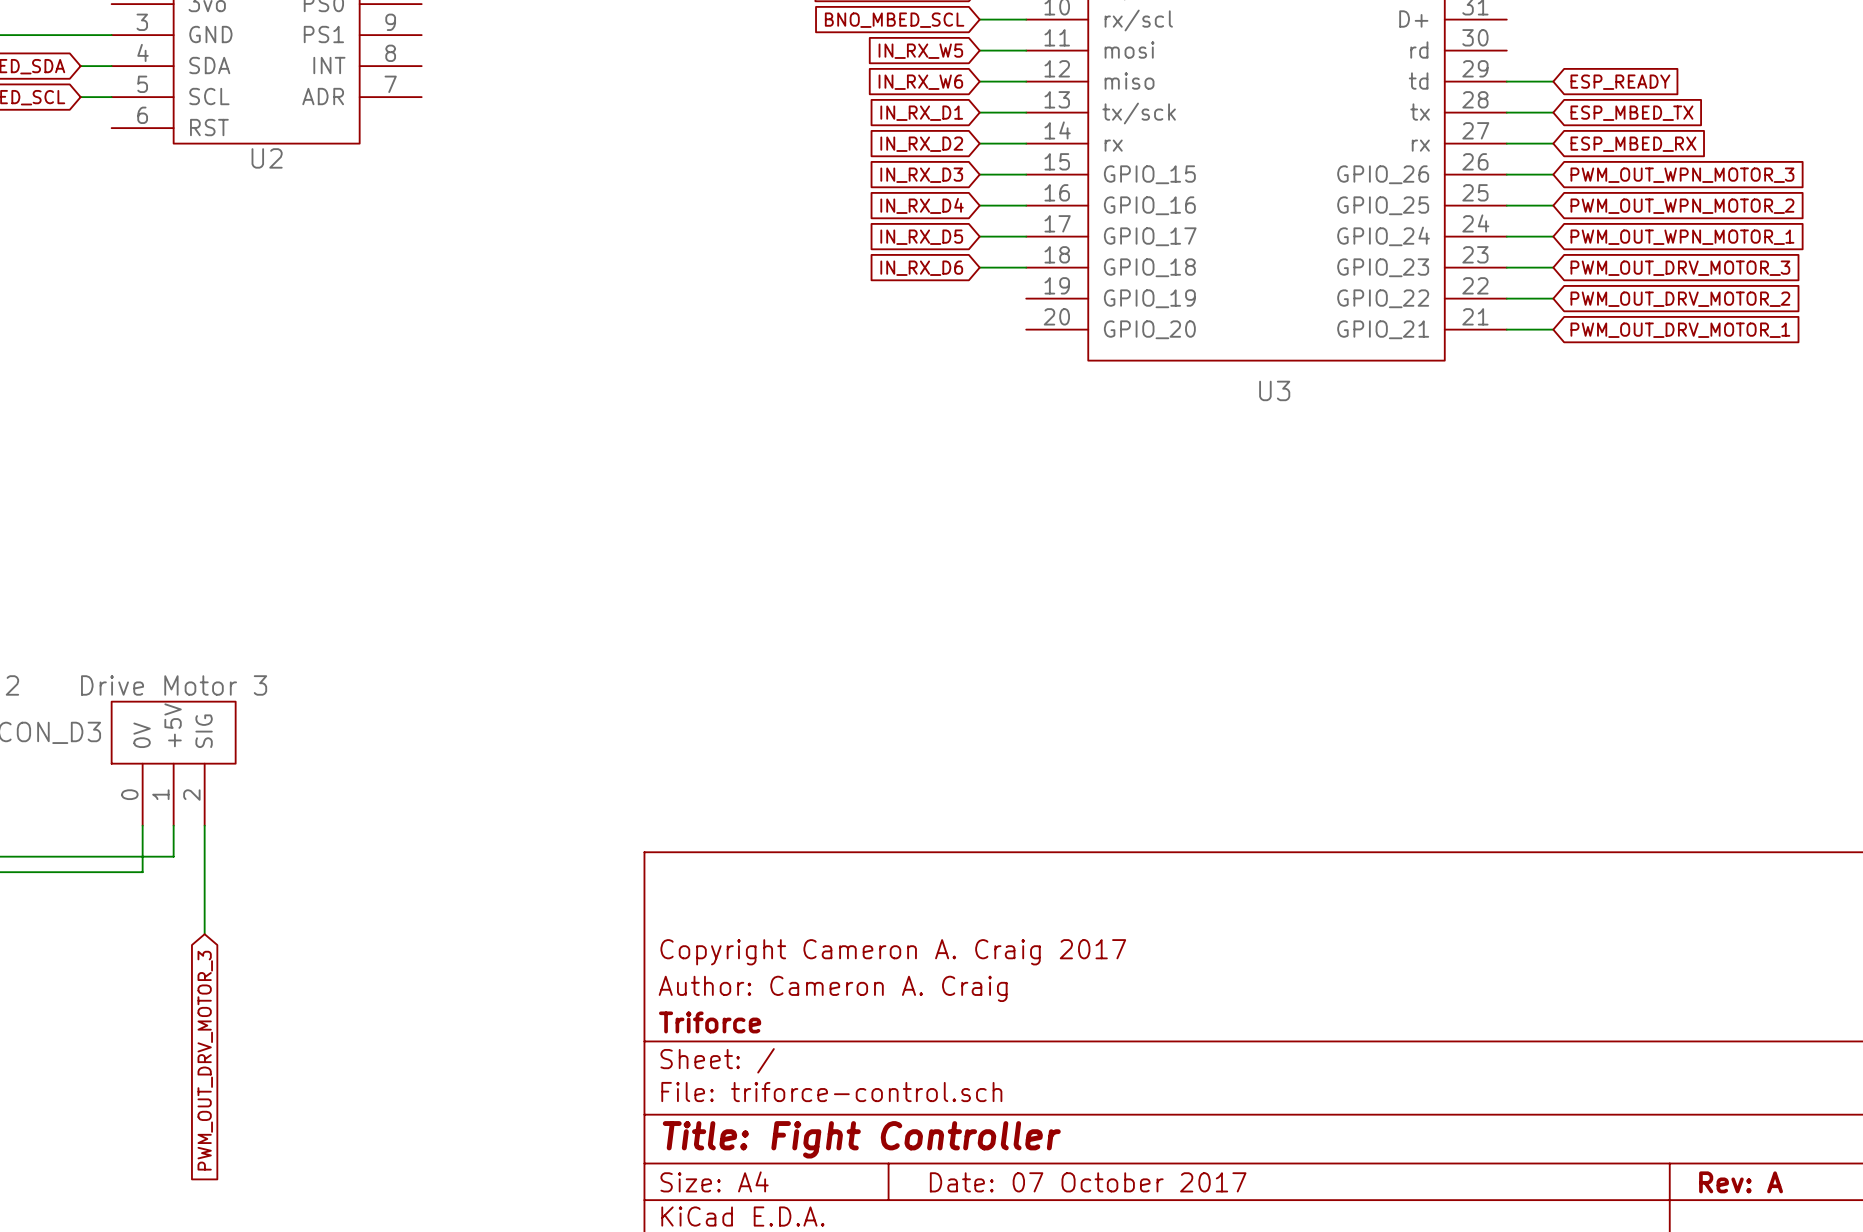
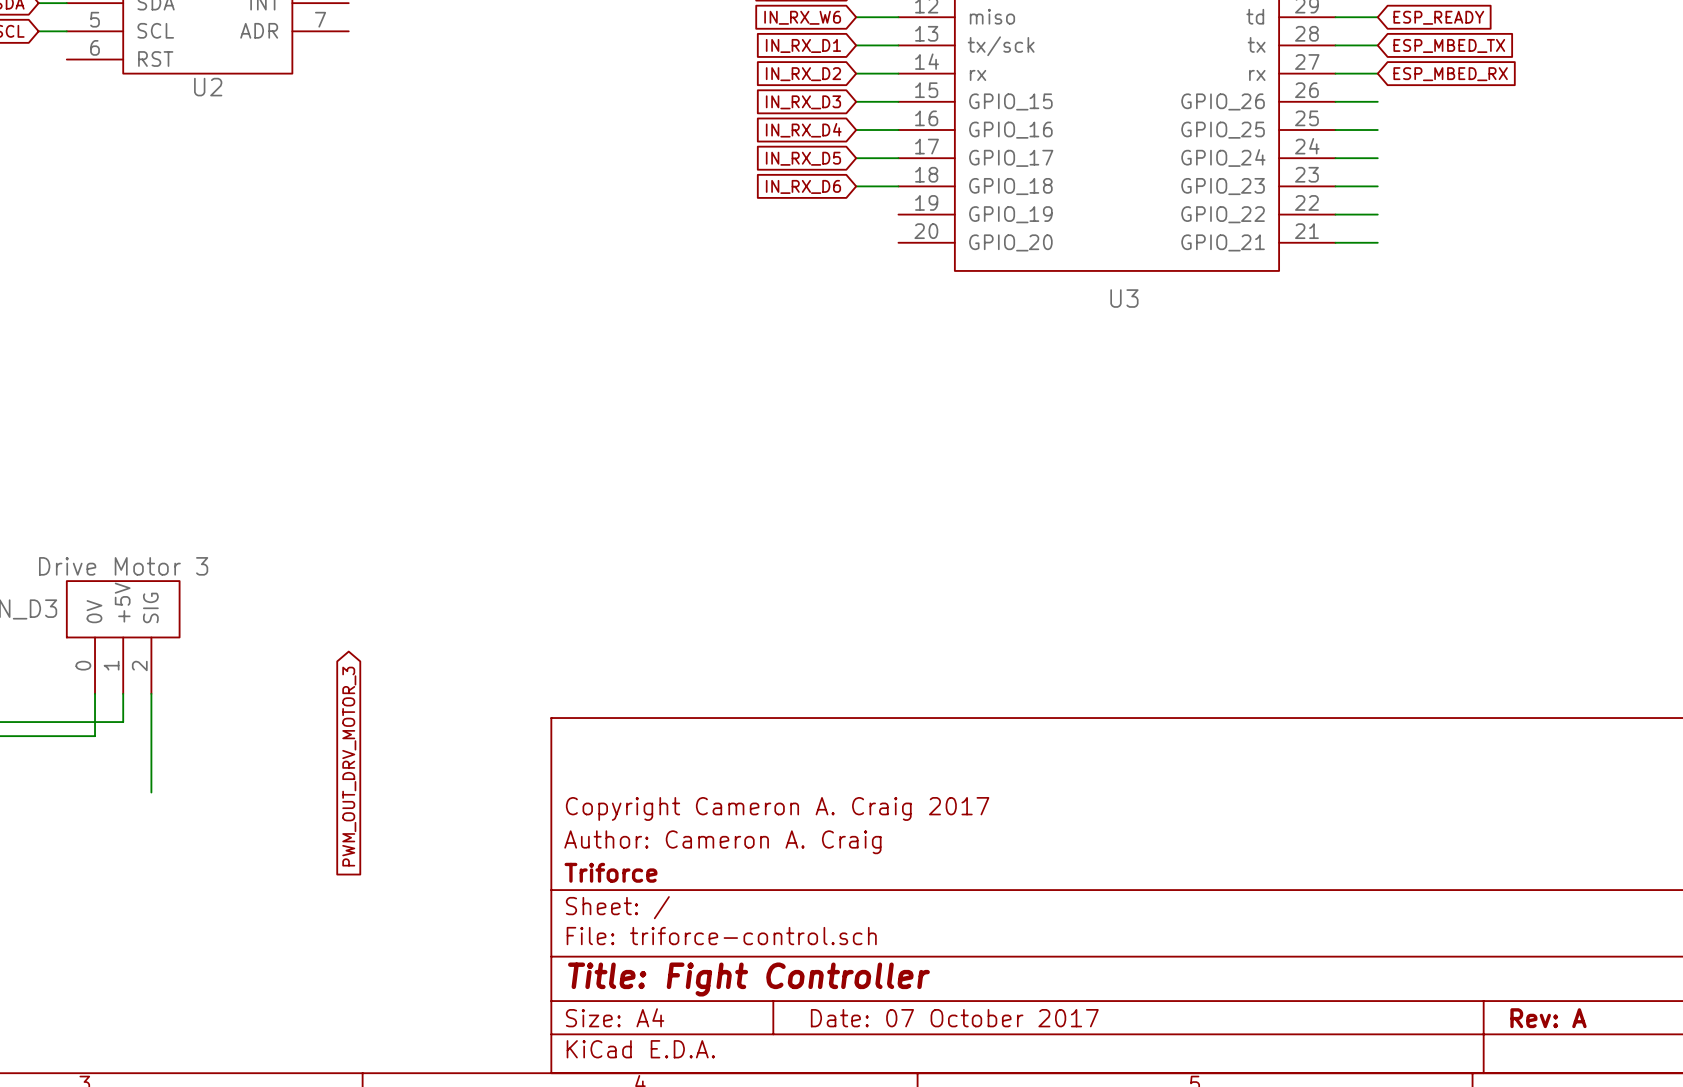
global label: PWM_OUT_WPN_MOTOR_3 (1682, 175) -> none
global label: PWM_OUT_WPN_MOTOR_2 (1682, 206) -> none
global label: PWM_OUT_WPN_MOTOR_1 (1682, 237) -> none
global label: PWM_OUT_DRV_MOTOR_3 (1680, 268) -> none
global label: PWM_OUT_DRV_MOTOR_2 (1680, 299) -> none
global label: PWM_OUT_DRV_MOTOR_1 (1680, 330) -> none
global label position: PWM_OUT_DRV_MOTOR_3 (205, 1060) -> PWM_OUT_DRV_MOTOR_3 (349, 766)

